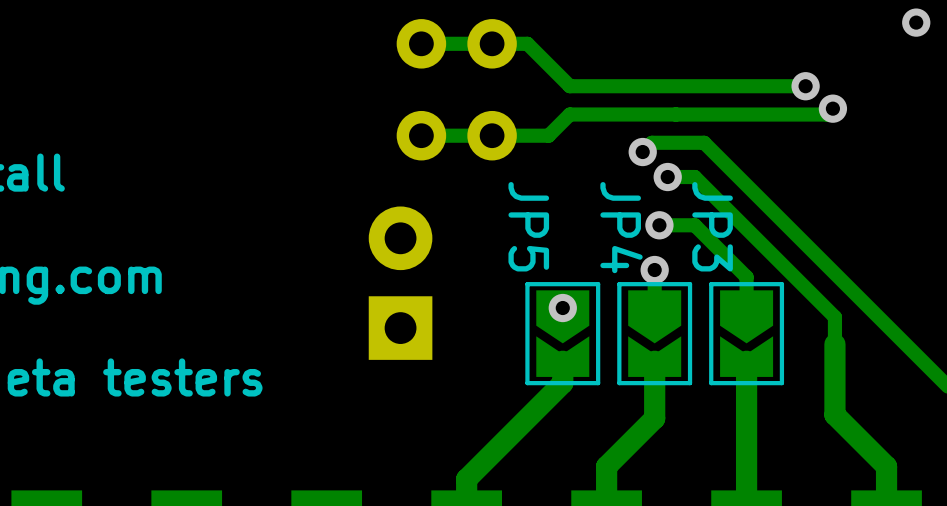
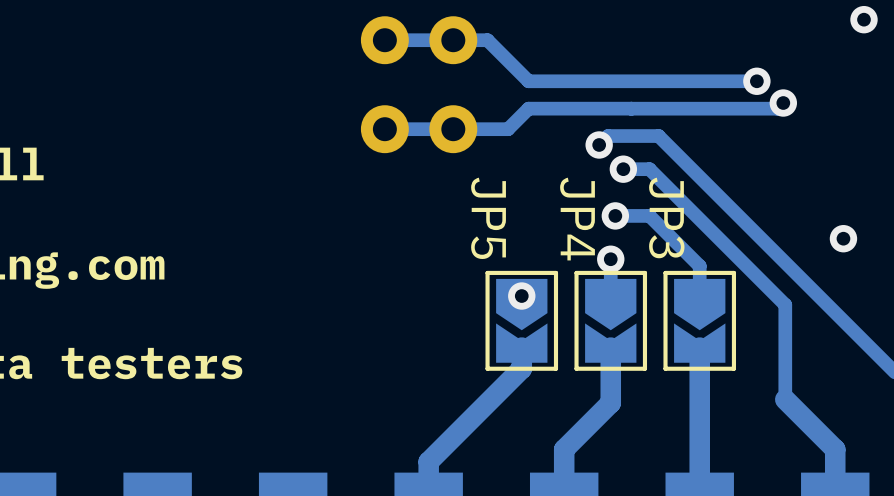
via: none -> (843, 238)
part: (400, 283) -> none
track width: thick (834, 344) (834, 414) -> thin (785, 331) (785, 399)

